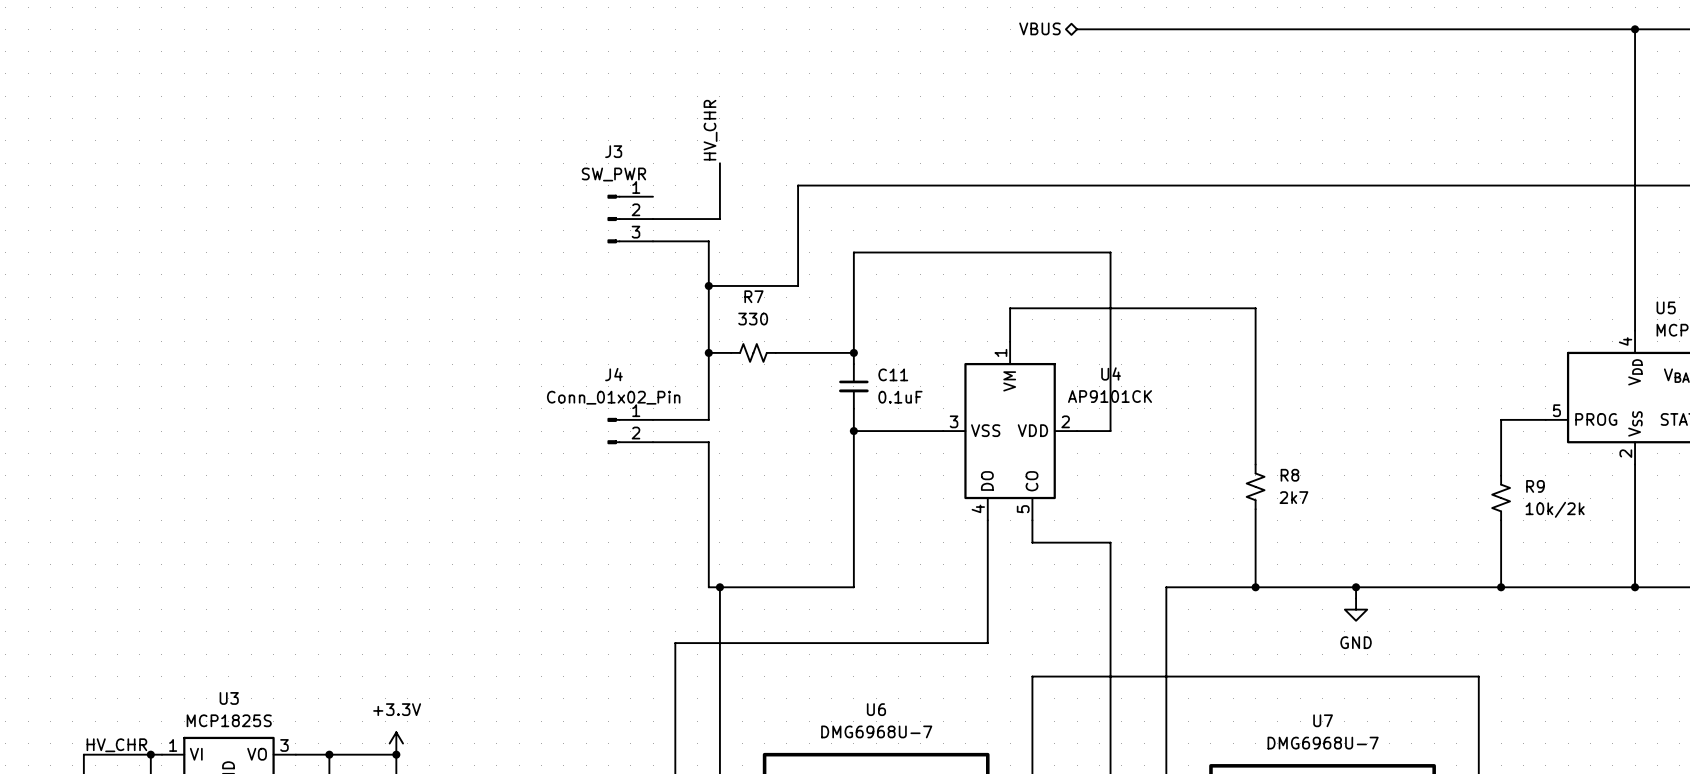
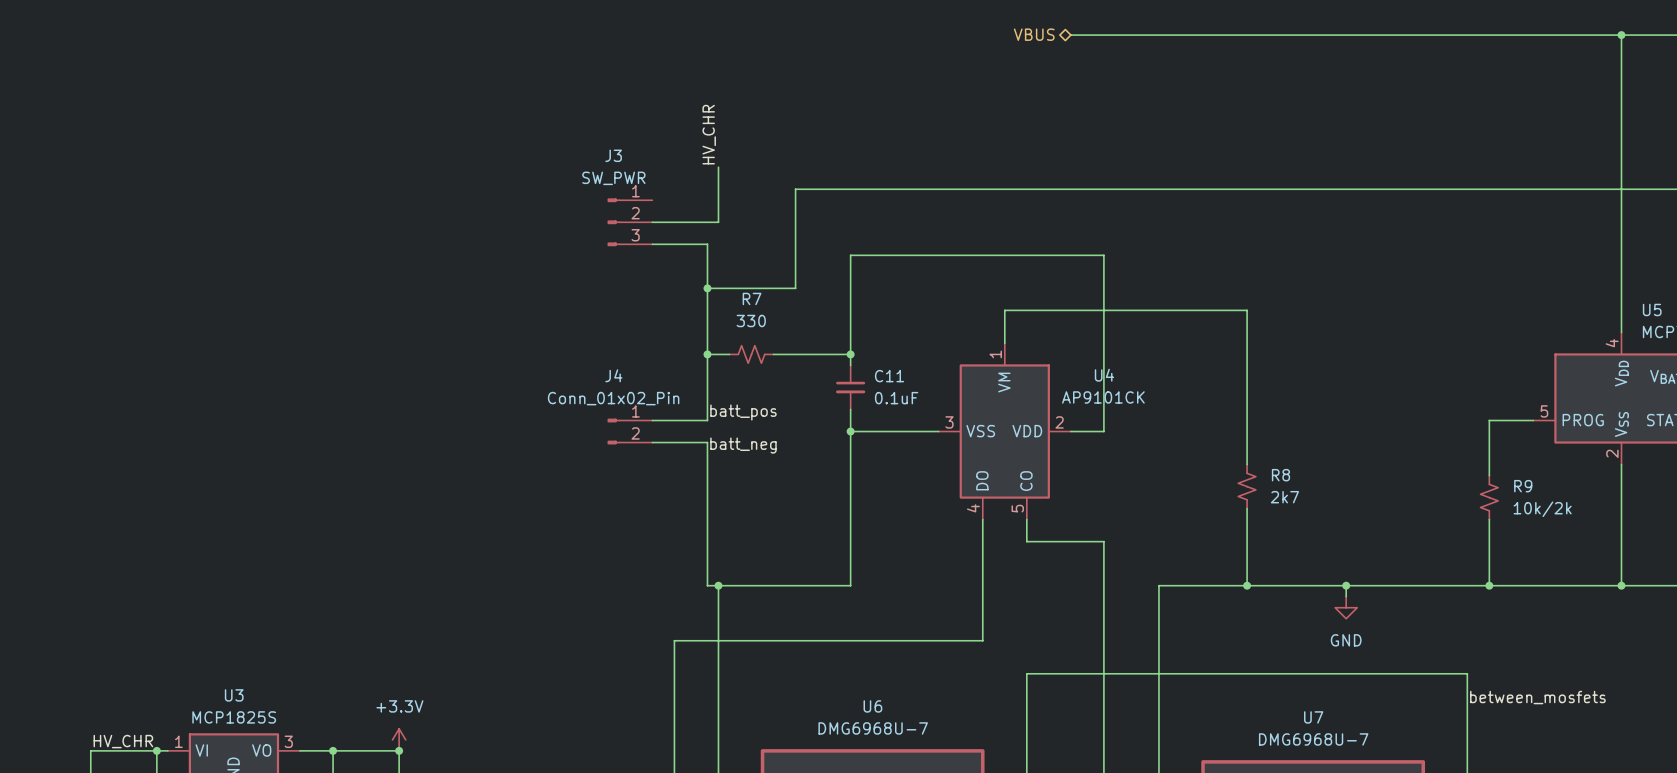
label: none -> batt_pos (743, 412)
label: none -> batt_neg (743, 445)
label: none -> between_mosfets (1537, 697)

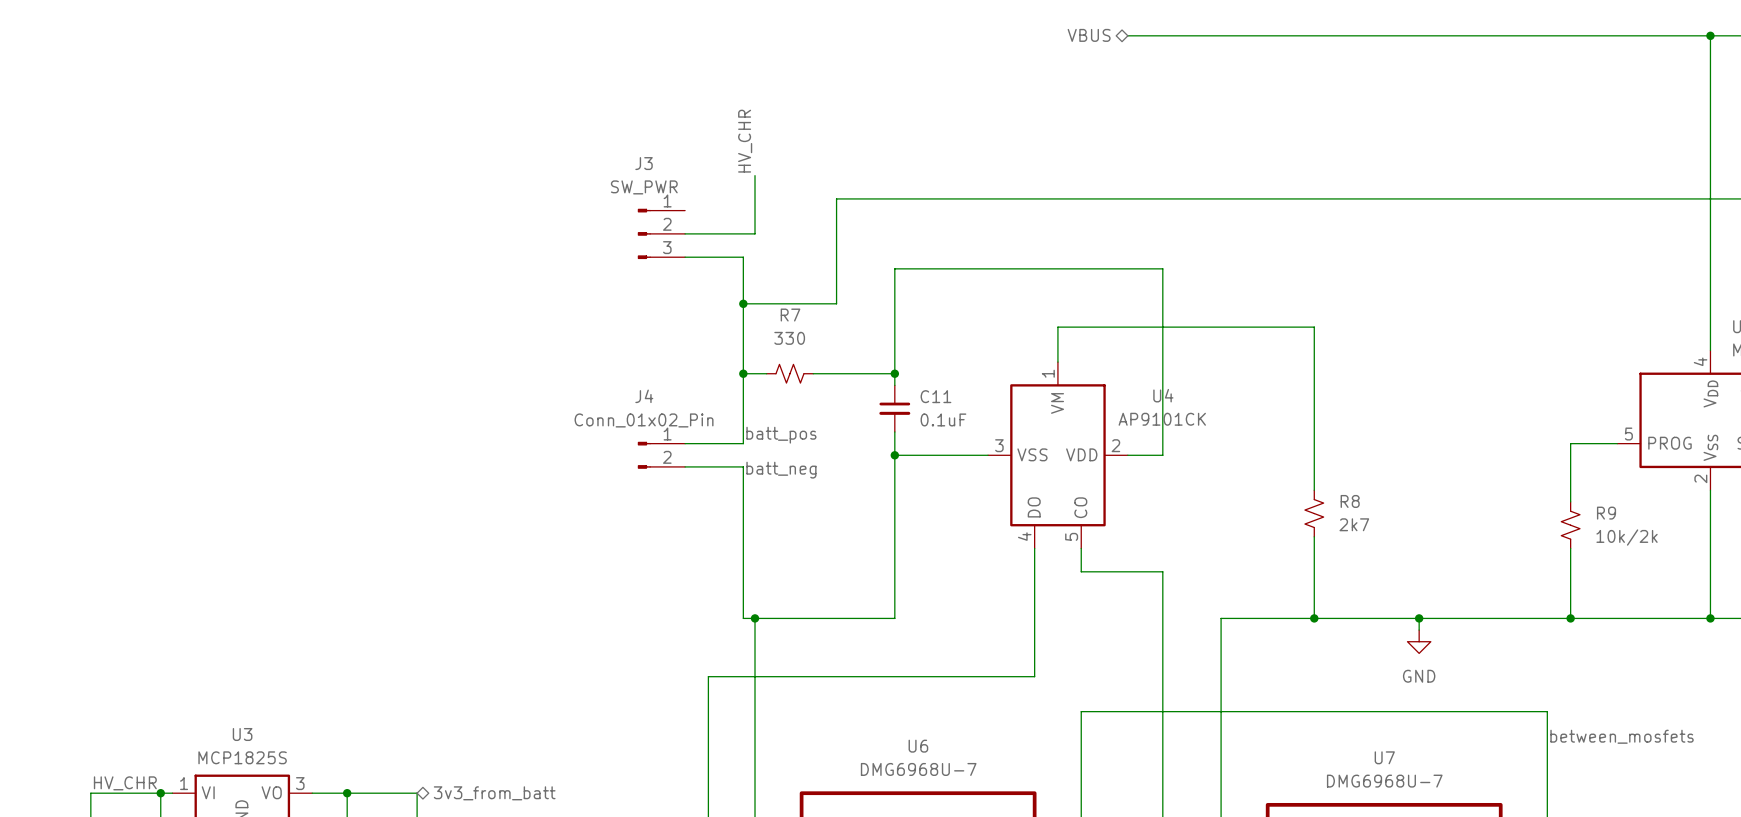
power symbol: +3.3V (399, 739) -> none
junction: (399, 750) -> none
hierarchical label: none -> 3v3_from_batt (494, 793)

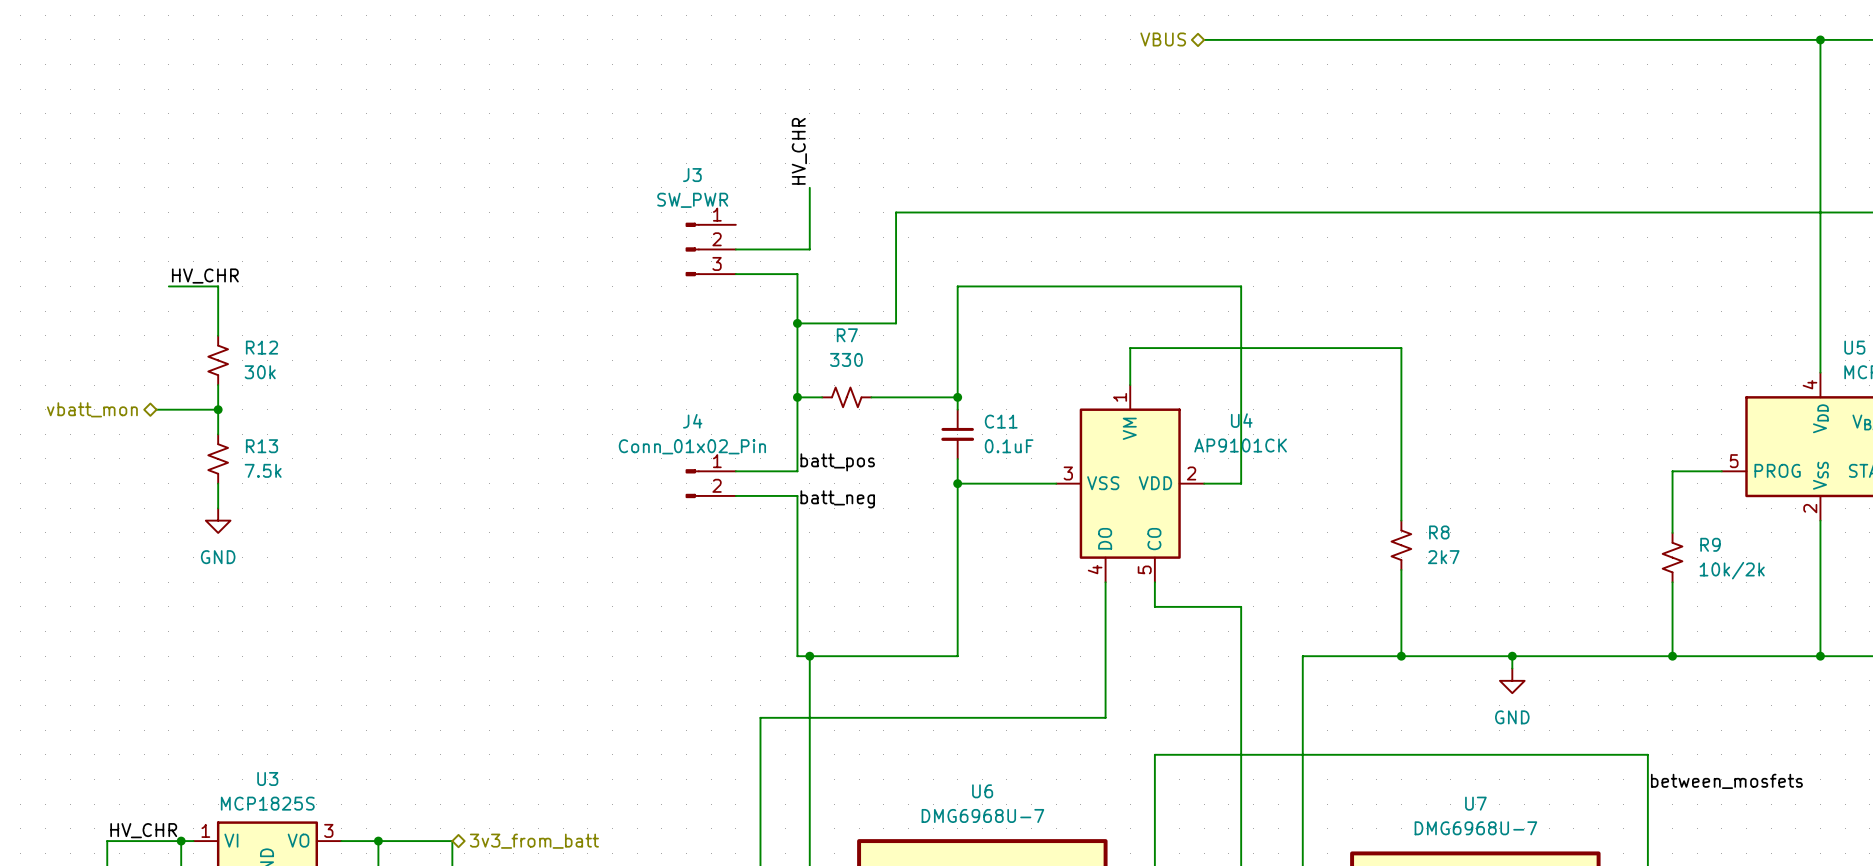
label: none -> HV_CHR (205, 276)
wire: none -> (168, 286) (218, 286) (218, 335)
R12: none -> 30k (218, 360)
wire: none -> (218, 385) (218, 434)
hierarchical label: none -> vbatt_mon (92, 409)
wire: none -> (156, 409) (218, 409)
junction: none -> (218, 409)
R13: none -> 7.5k (218, 458)
wire: none -> (218, 483) (218, 508)
power symbol: none -> GND (218, 520)

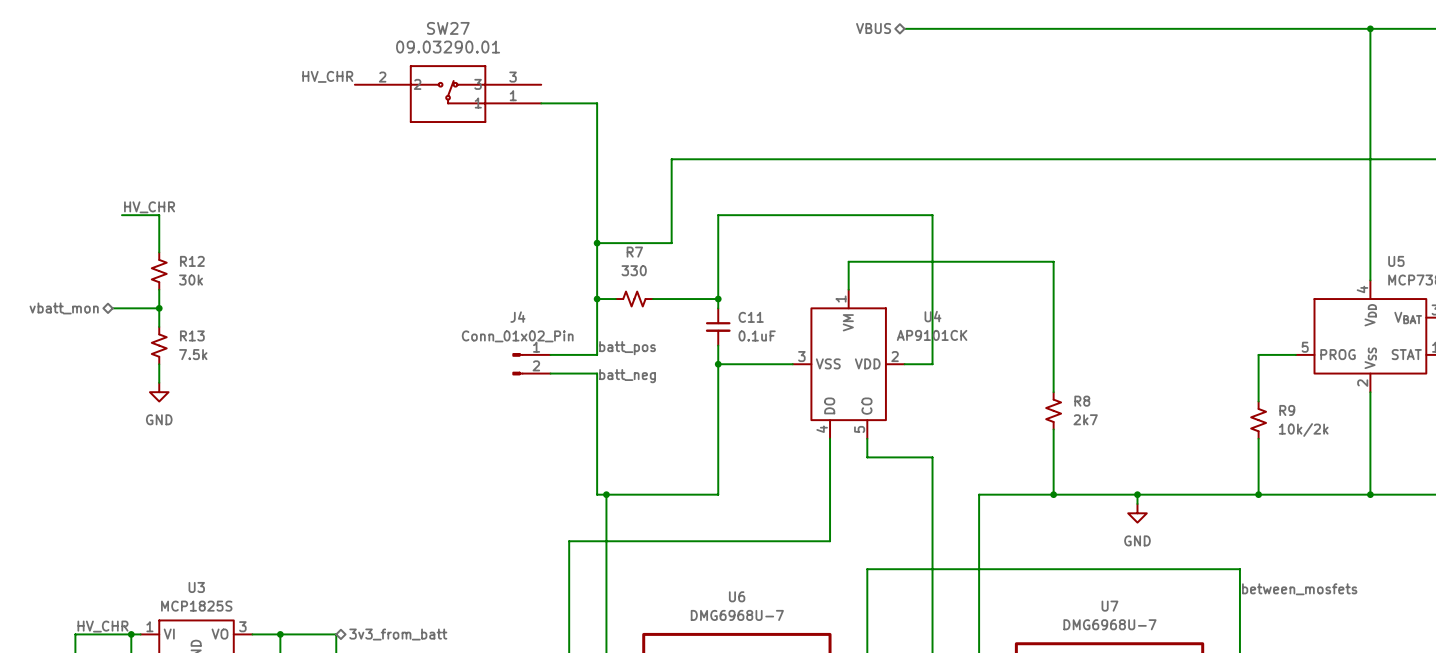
label: none -> HV_CHR (327, 76)
SW27: none -> 09.03290.01 (448, 94)
label: HV_CHR (799, 151) -> none
wire: (809, 187) (809, 249) (735, 249) -> none
J3: SW_PWR (710, 249) -> none
wire: (735, 274) (797, 274) -> (541, 103) (597, 103) (597, 205)

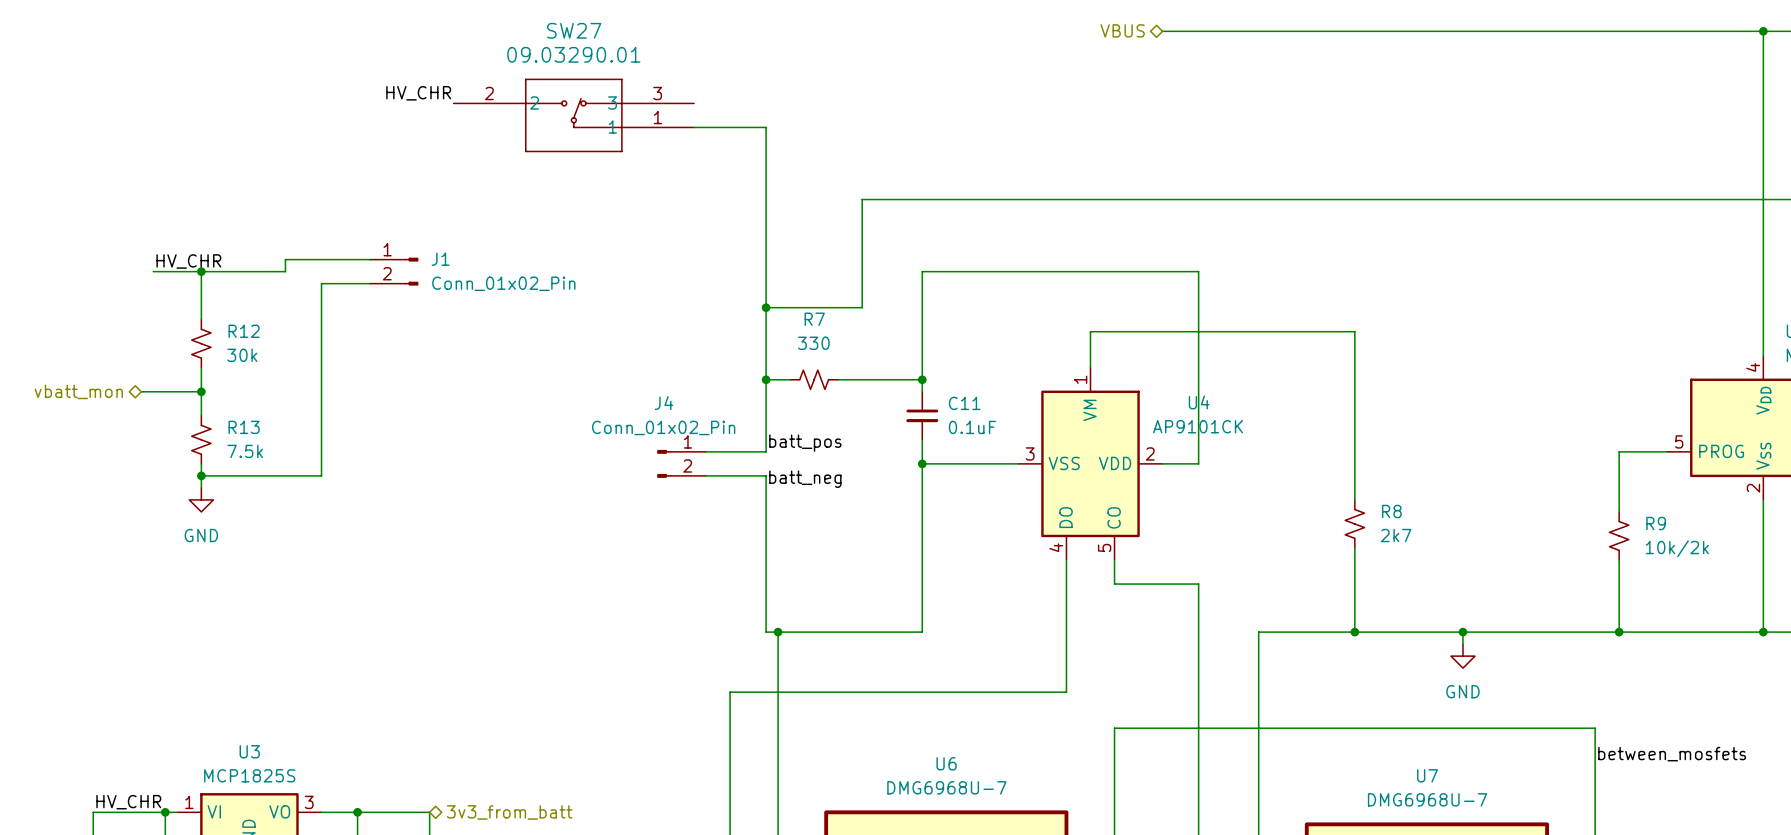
wire: none -> (369, 259) (285, 259) (285, 271) (201, 271)
junction: none -> (201, 271)
J1: none -> Conn_01x02_Pin (393, 271)
wire: none -> (369, 283) (321, 283) (321, 475) (201, 475)
junction: none -> (201, 475)

